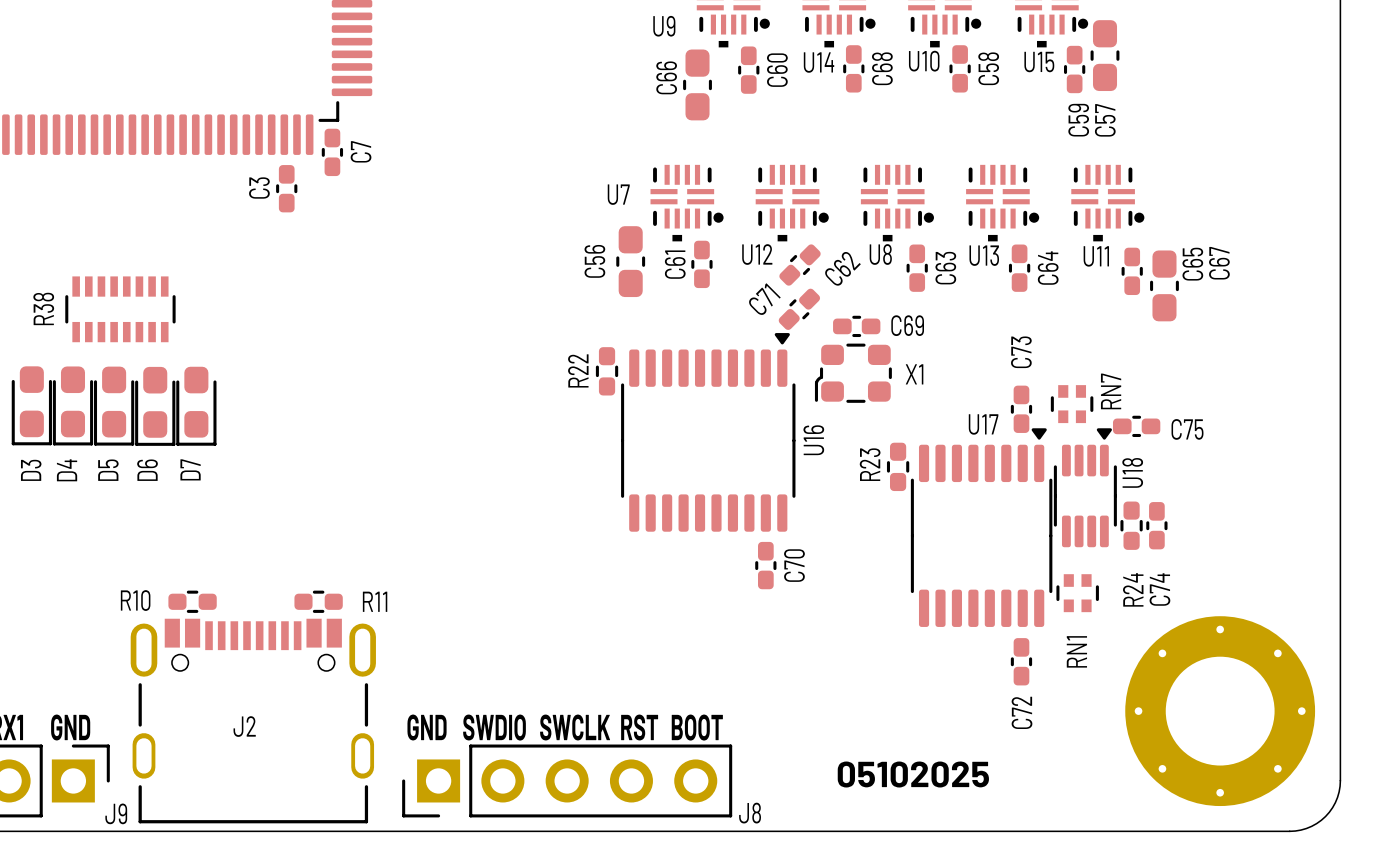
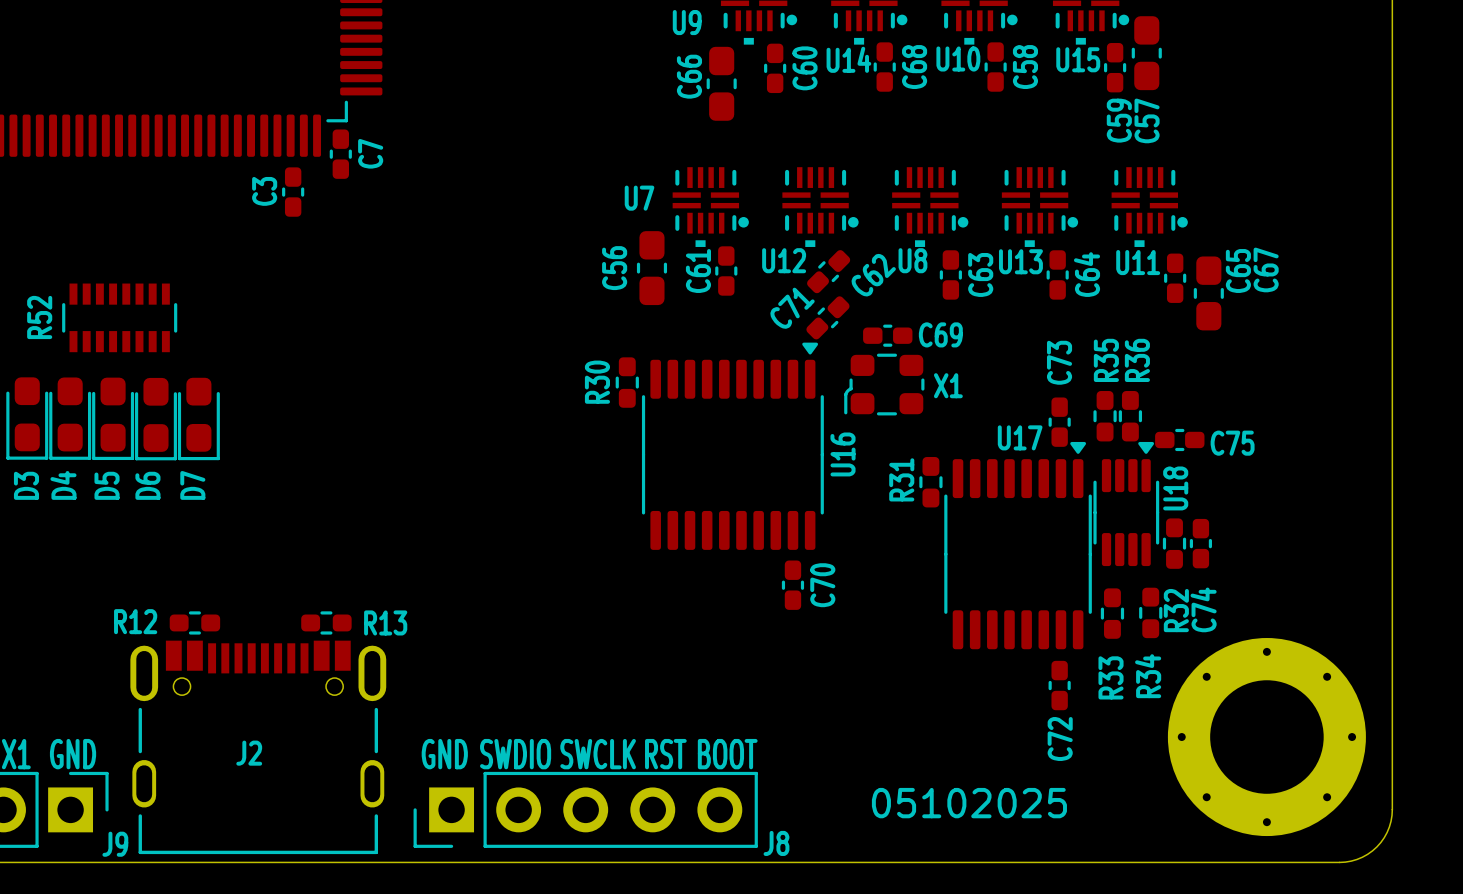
R38 name: R38 (43, 308) -> R52 (39, 317)
R22 name: R22 (578, 370) -> R30 (597, 382)
R35: none -> (1105, 416)
R36: none -> (1130, 416)
RN7: (1072, 404) -> none
R23 name: R23 (870, 464) -> R31 (901, 479)
R24 name: R24 (1133, 589) -> R32 (1176, 610)
R33: none -> (1112, 613)
R34: none -> (1150, 612)
RN1: (1077, 593) -> none
R10 name: R10 (135, 600) -> R12 (135, 621)
R11 name: R11 (375, 601) -> R13 (385, 622)

